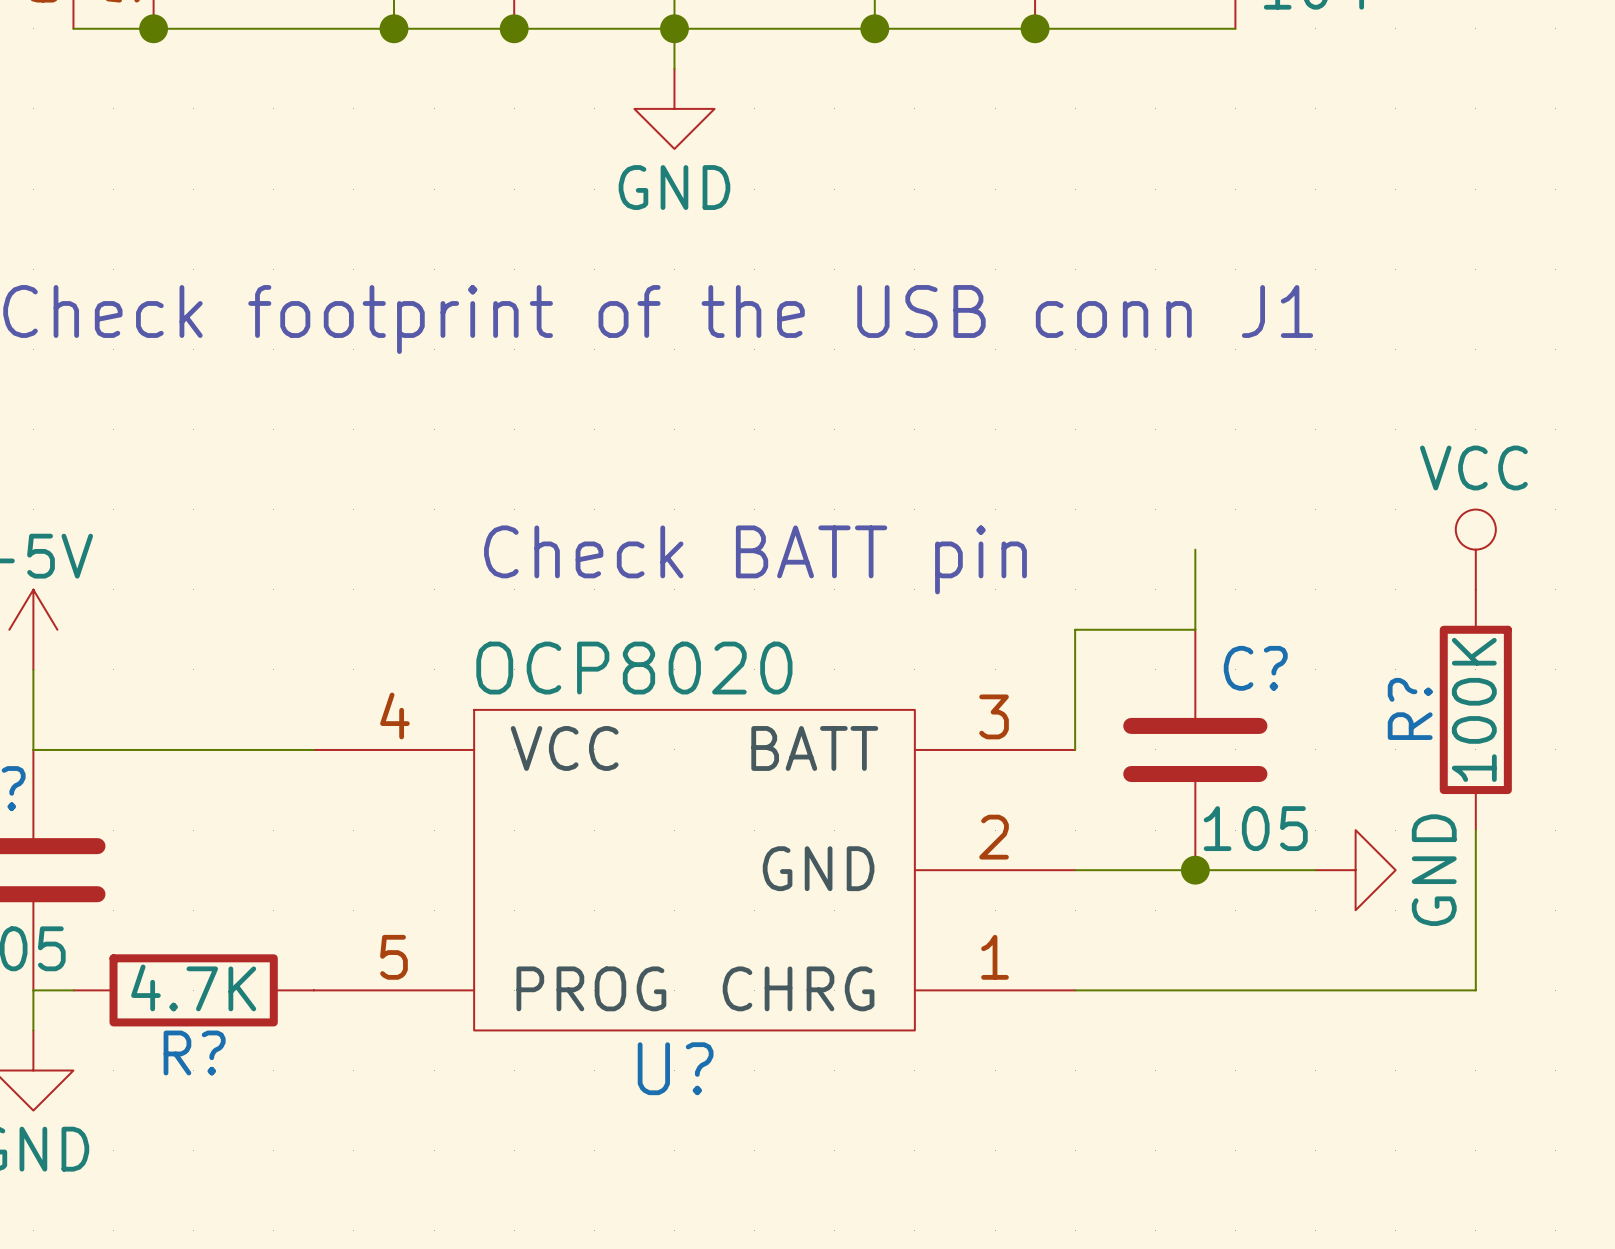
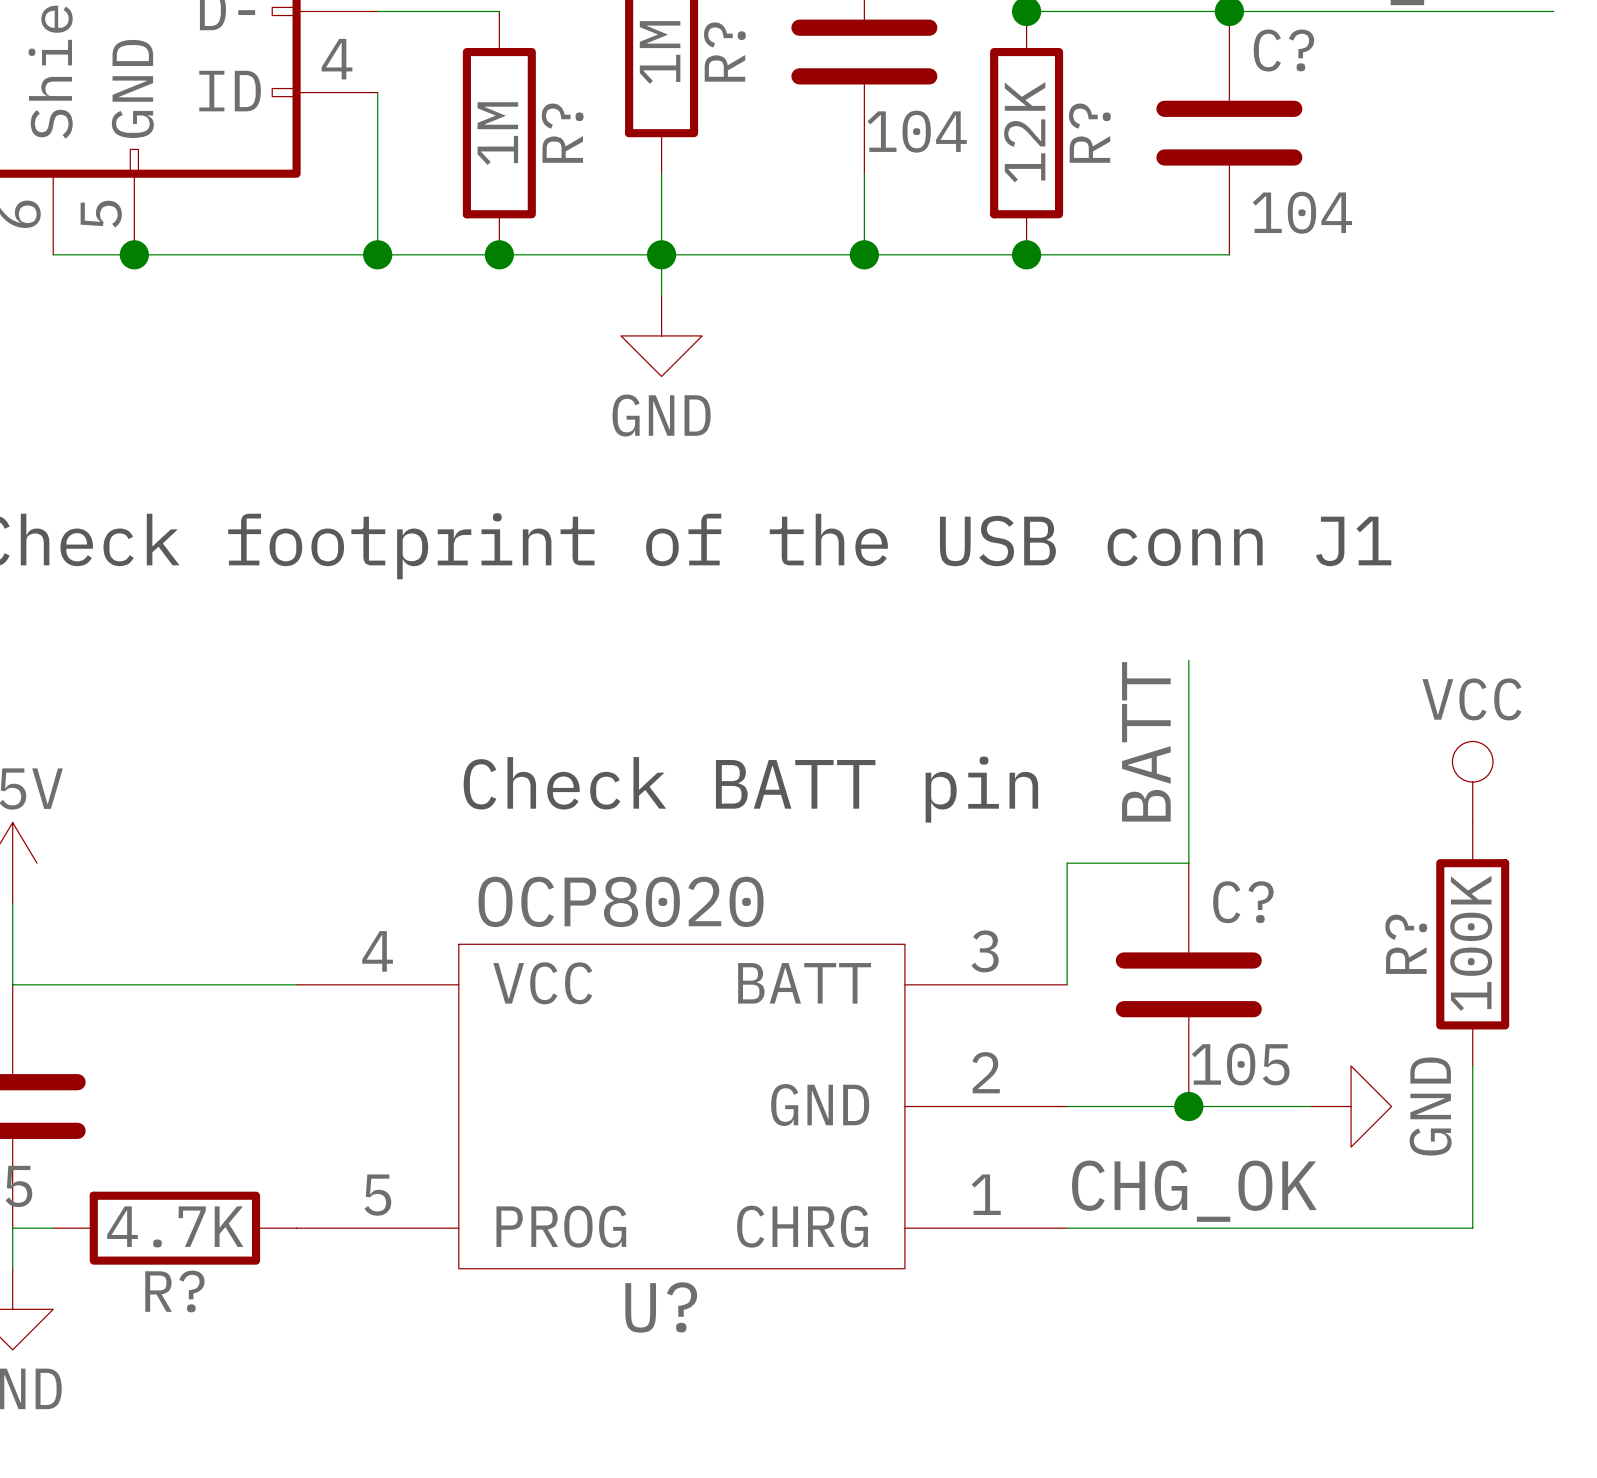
wire: none -> (1188, 660) (1188, 782)
label: none -> BATT (1146, 741)
label: none -> CHG_OK (1194, 1191)

